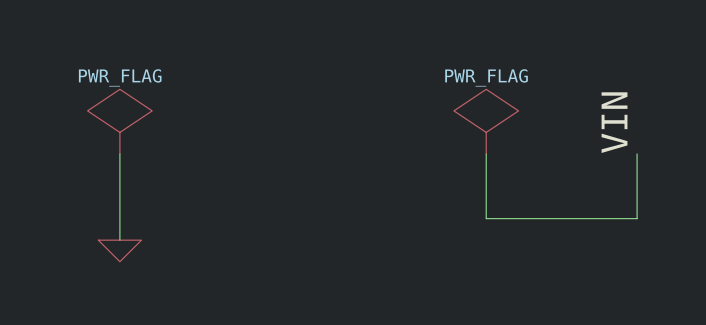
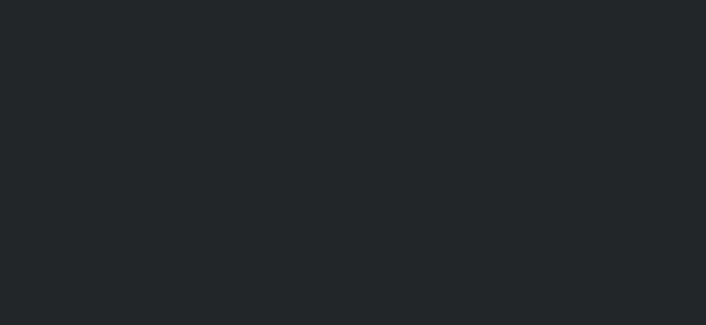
power symbol: PWR_FLAG (119, 121) -> none
power symbol: PWR_FLAG (486, 121) -> none
label: VIN (614, 122) -> none
wire: (119, 153) (119, 240) -> none
wire: (486, 153) (486, 218) (637, 218) (637, 153) -> none
power symbol: (119, 250) -> none

